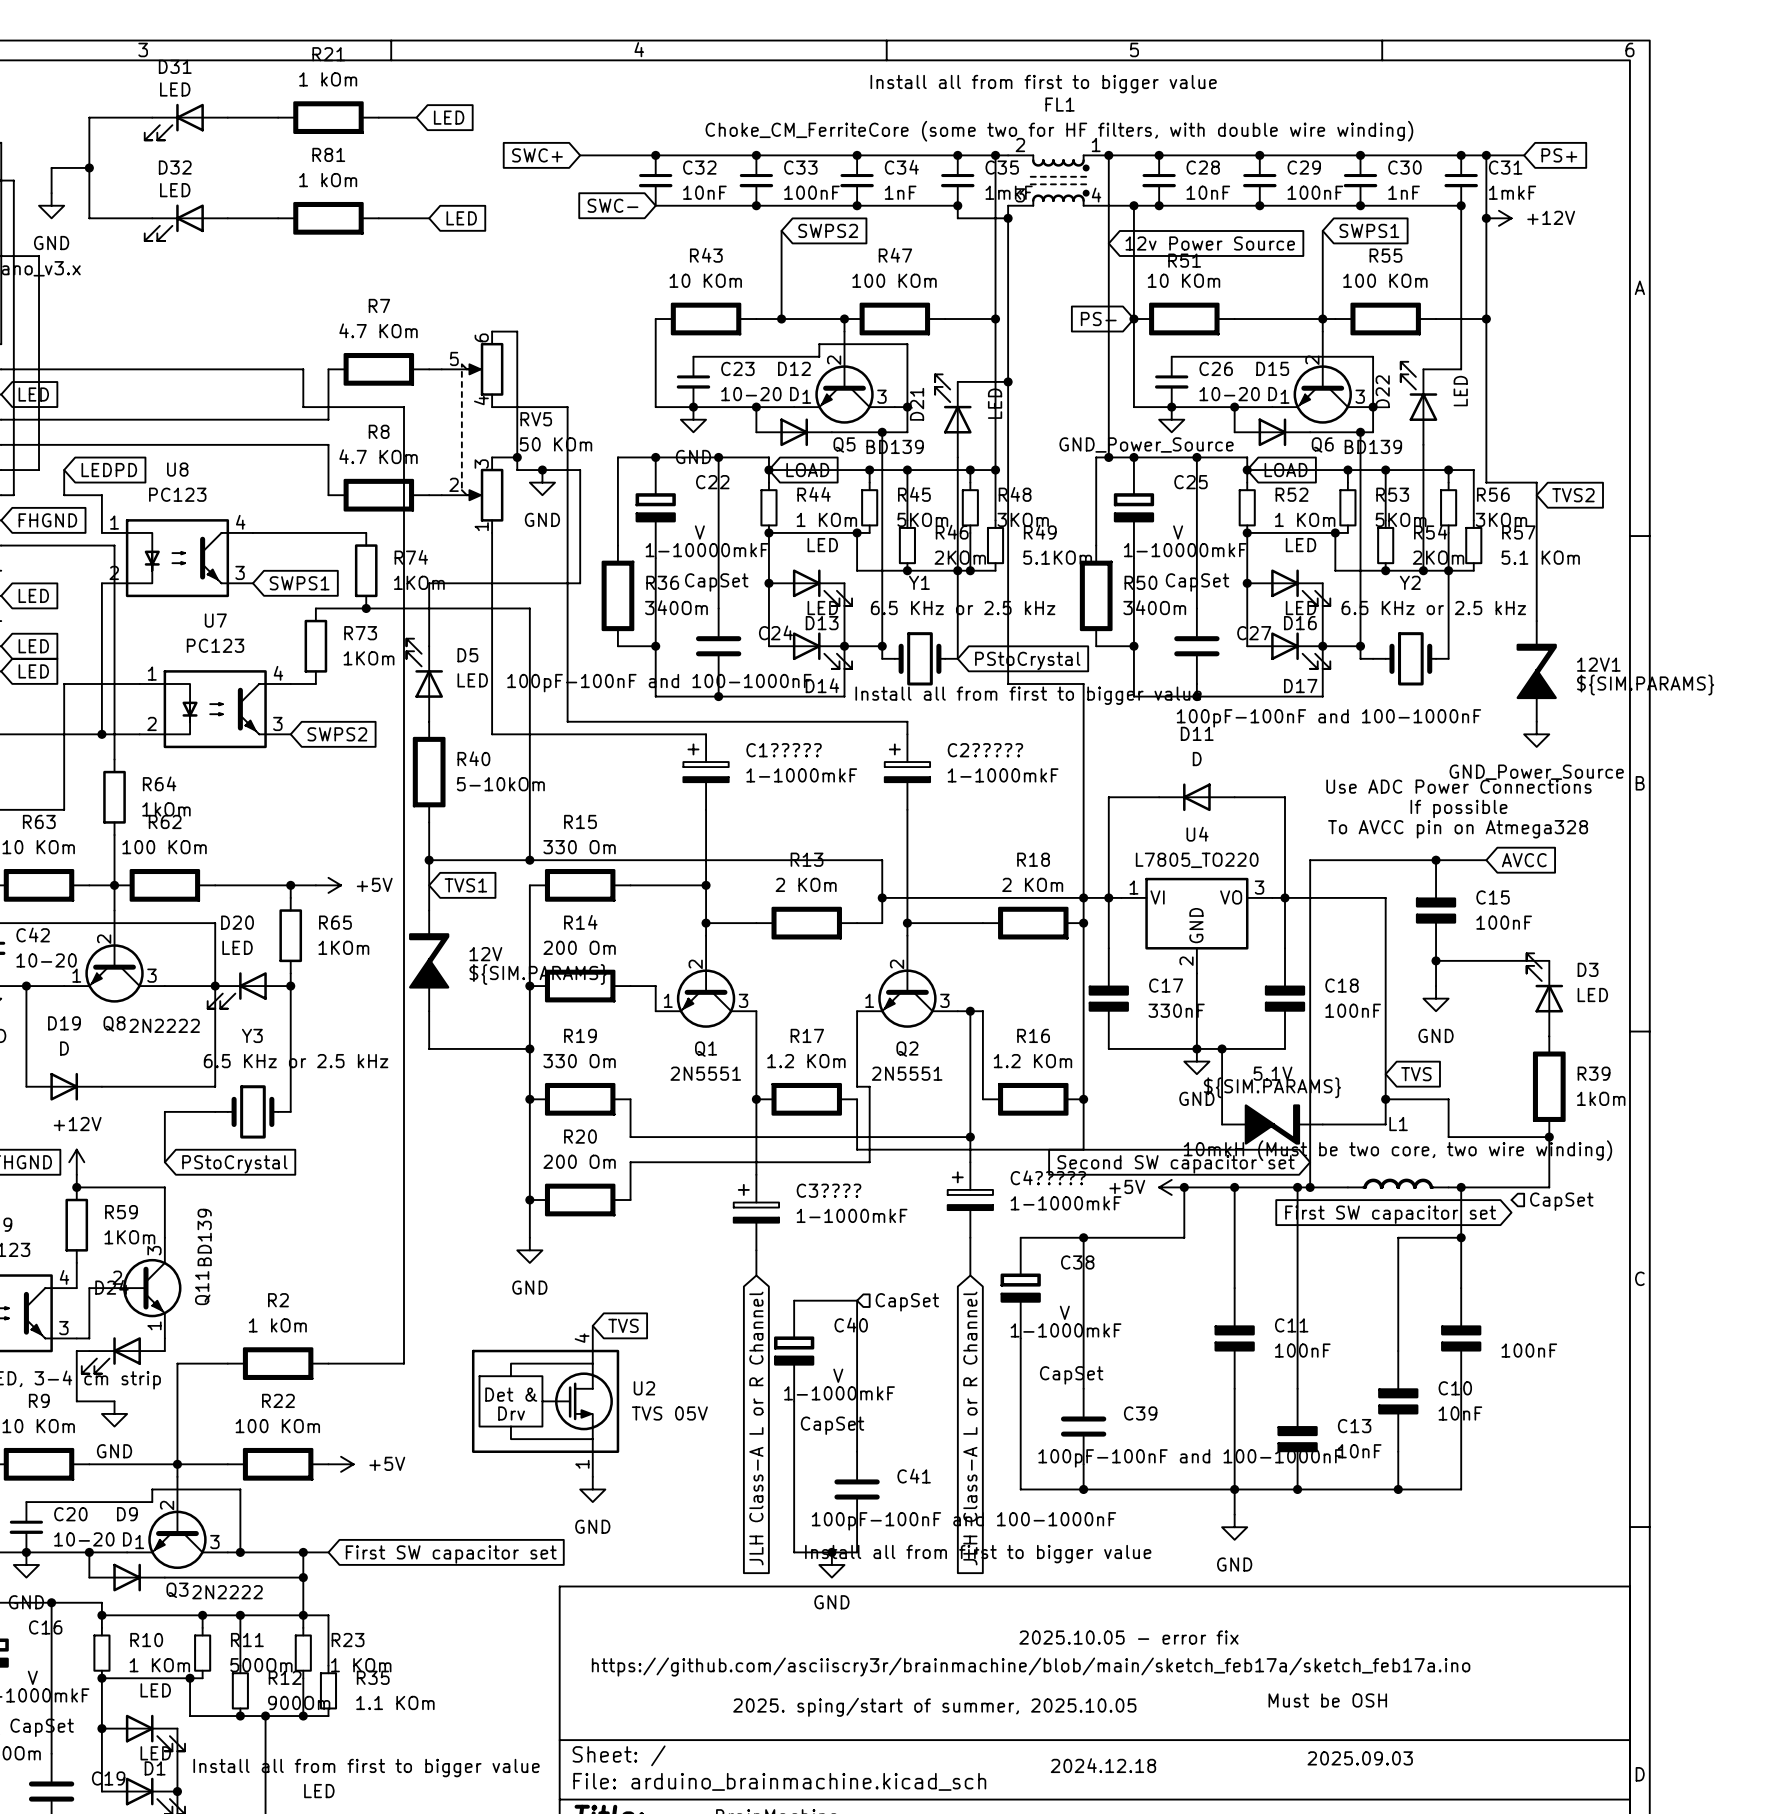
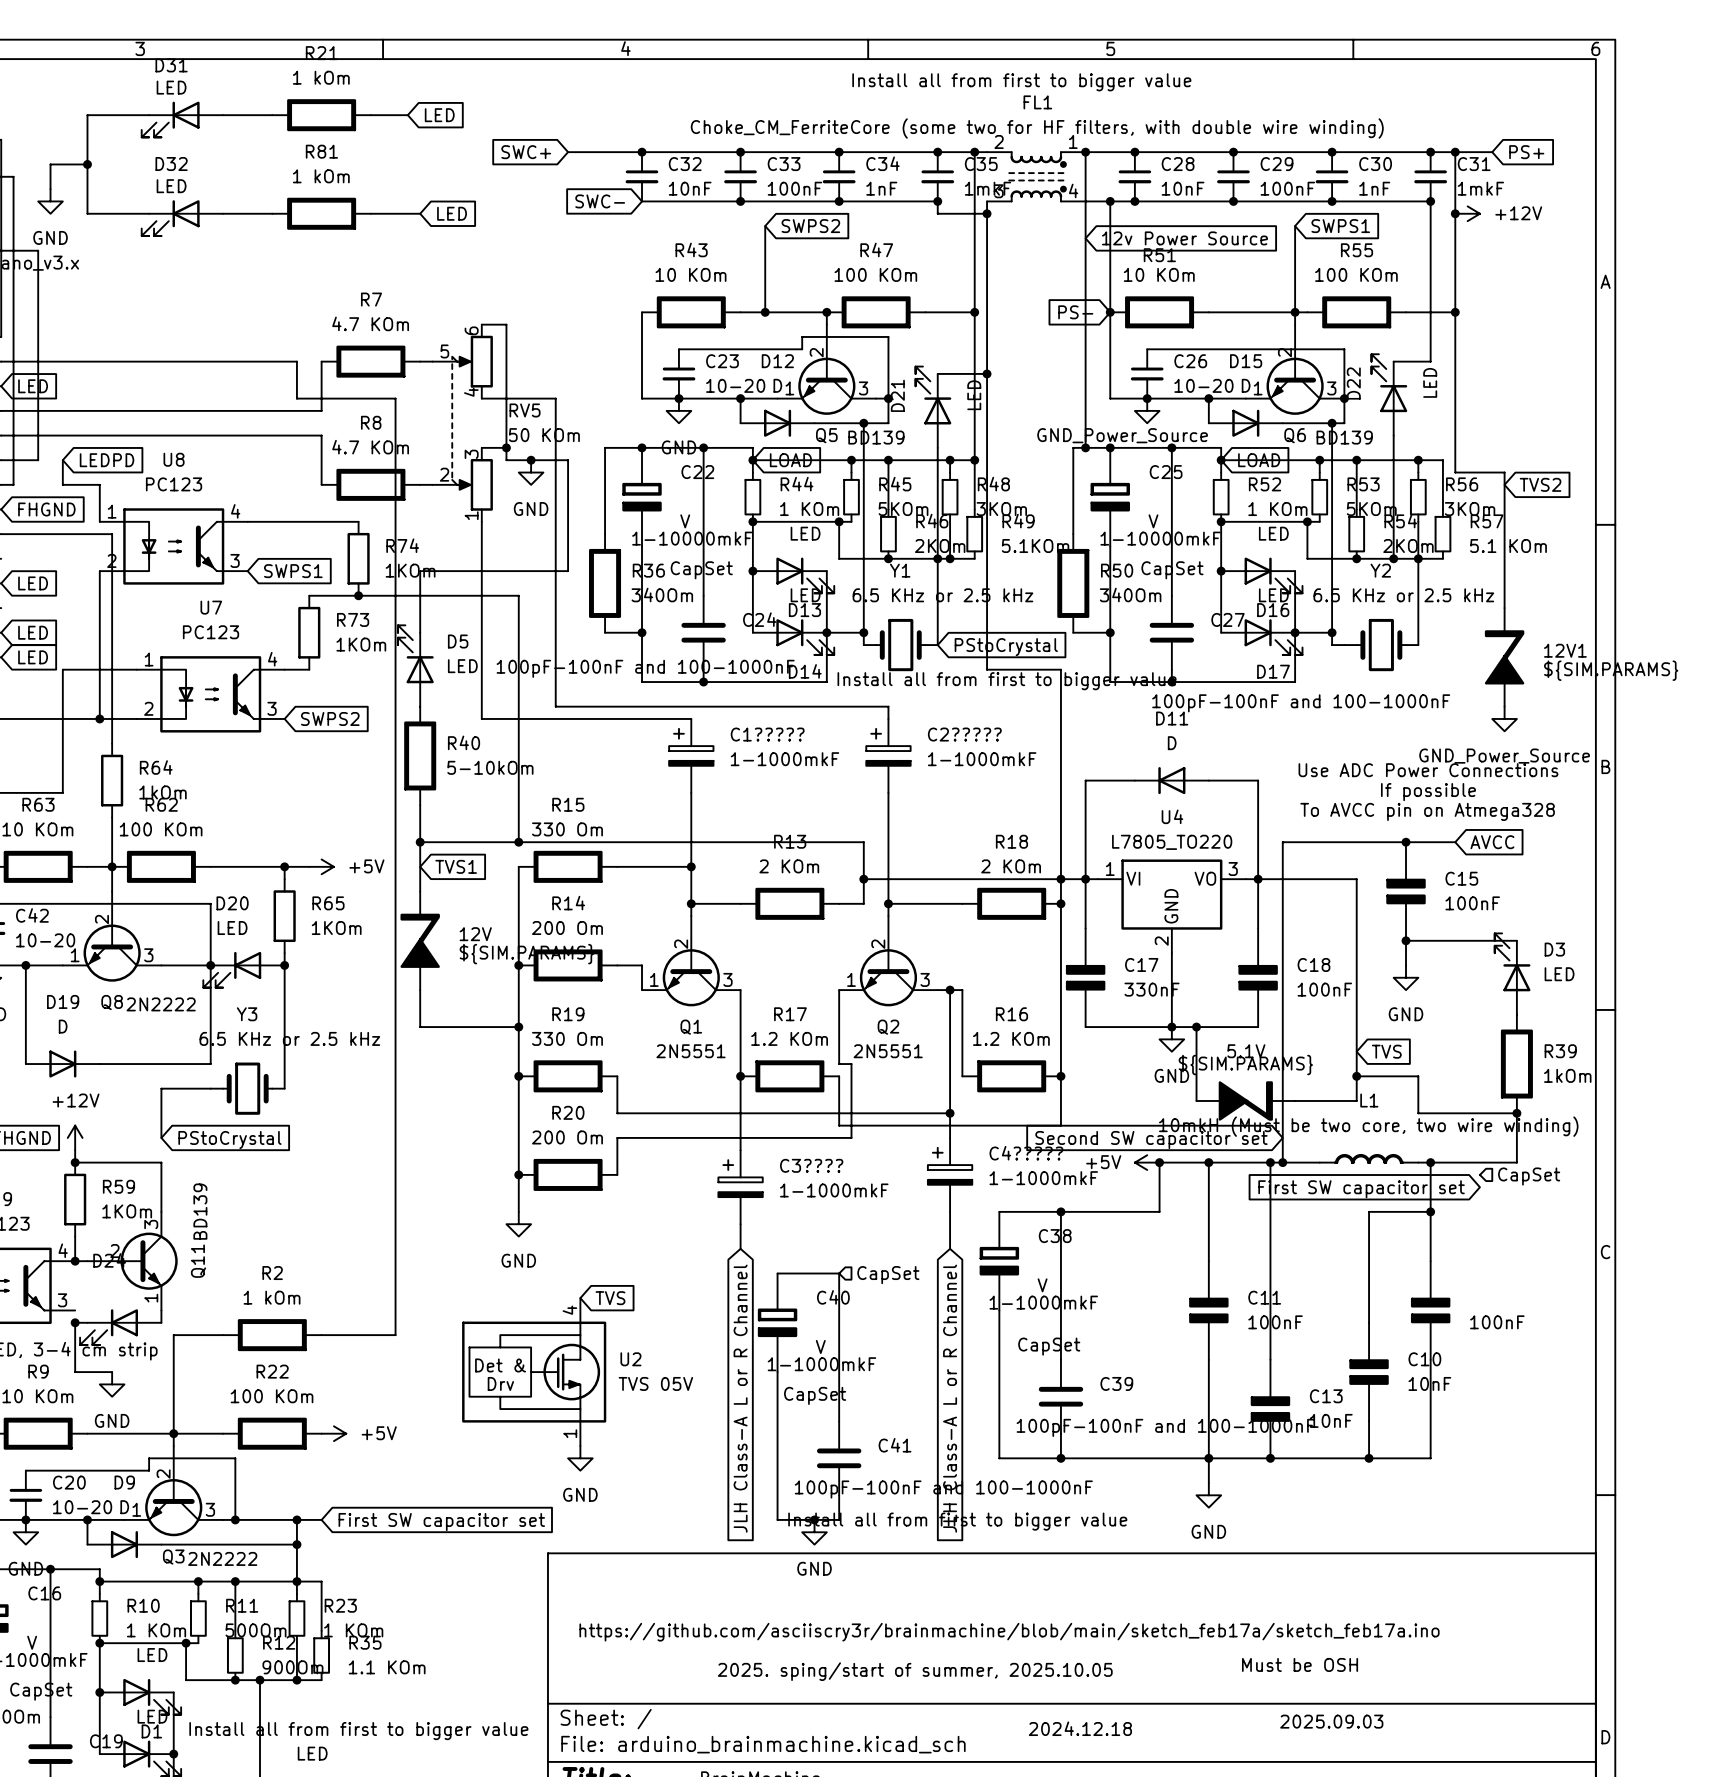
junction: none -> (75, 1261)
wire: (89, 1288) (89, 1338) (76, 1338) -> (87, 1261) (75, 1261)
junction: none -> (75, 1322)
text: 2025.10.05 - error fix (1128, 1637) -> none

